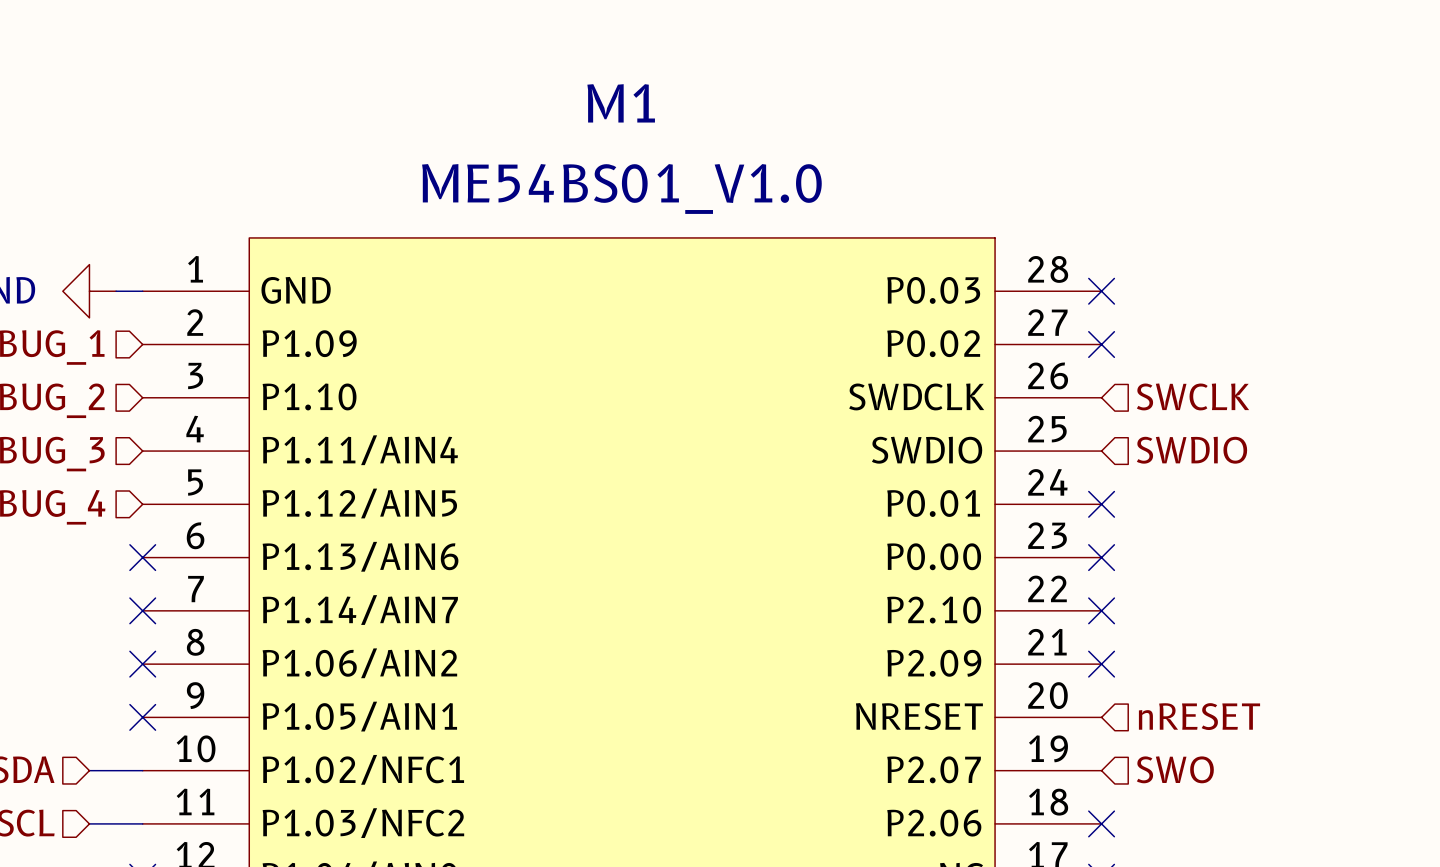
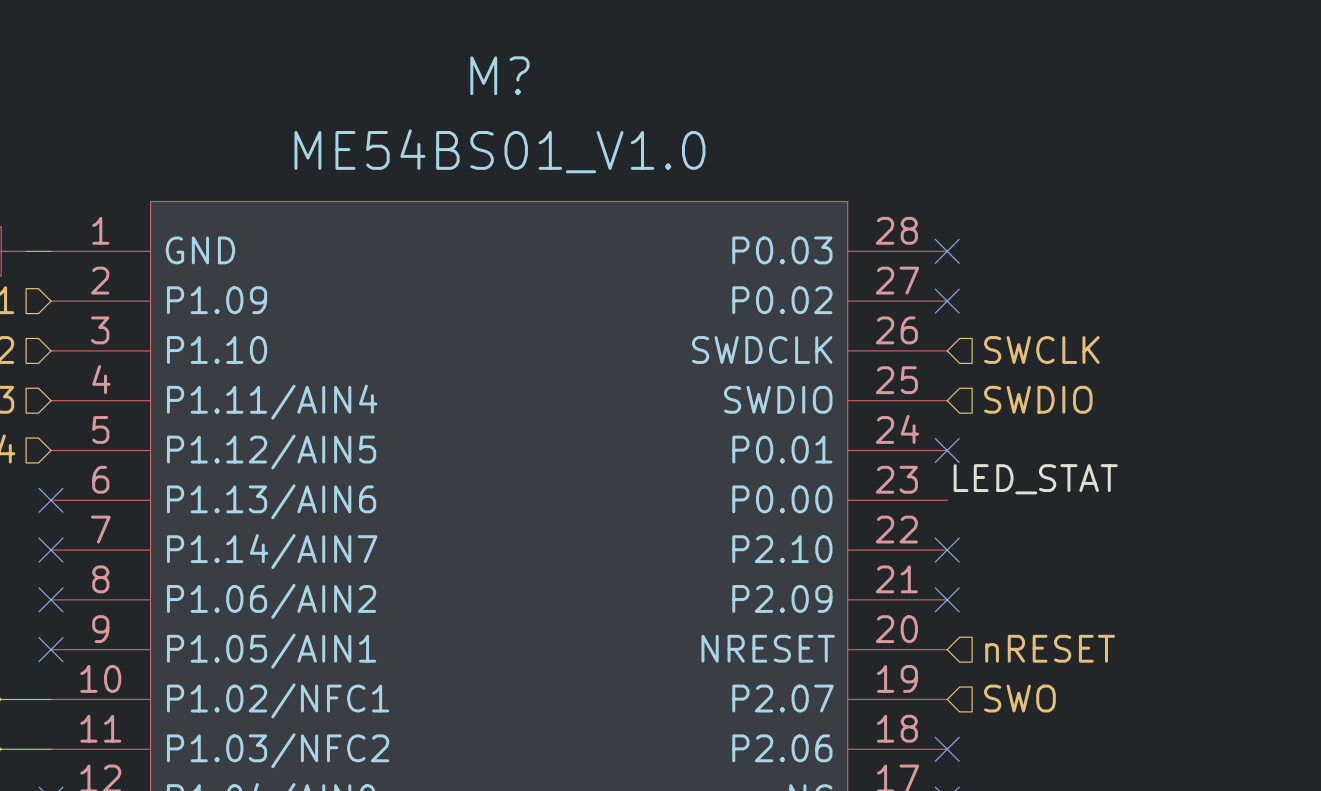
M1 name: M1 (621, 103) -> M? (499, 75)
label: none -> LED_STAT (1035, 479)
no-connect mark: (1101, 557) -> none

